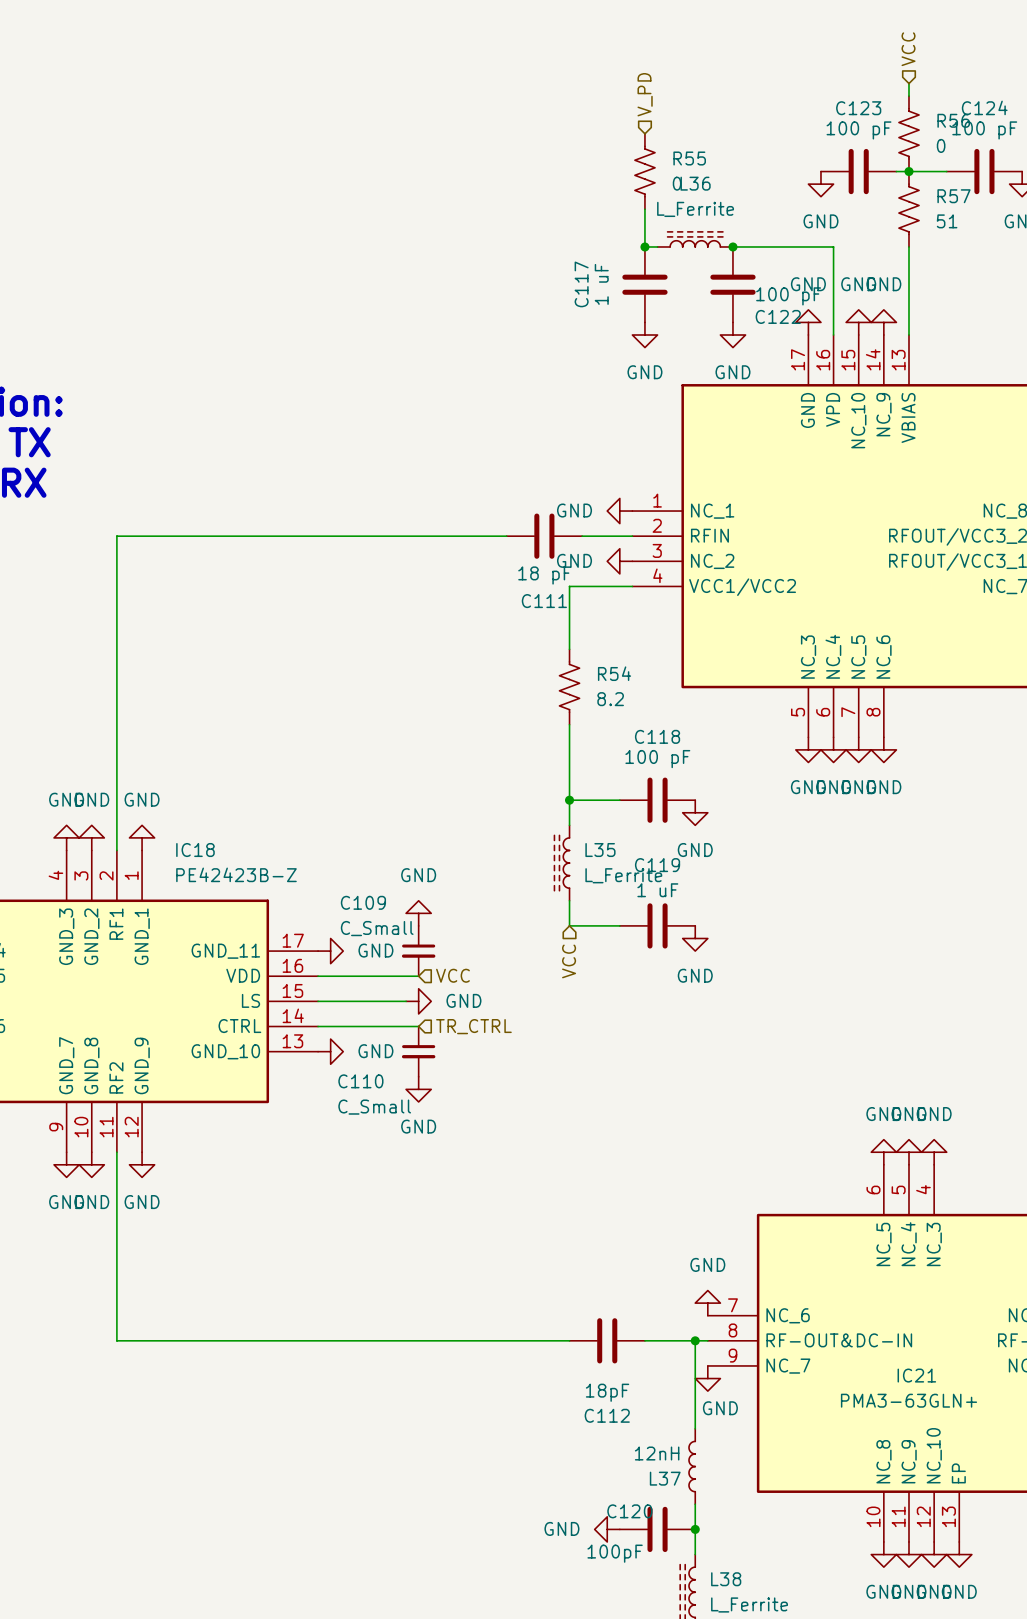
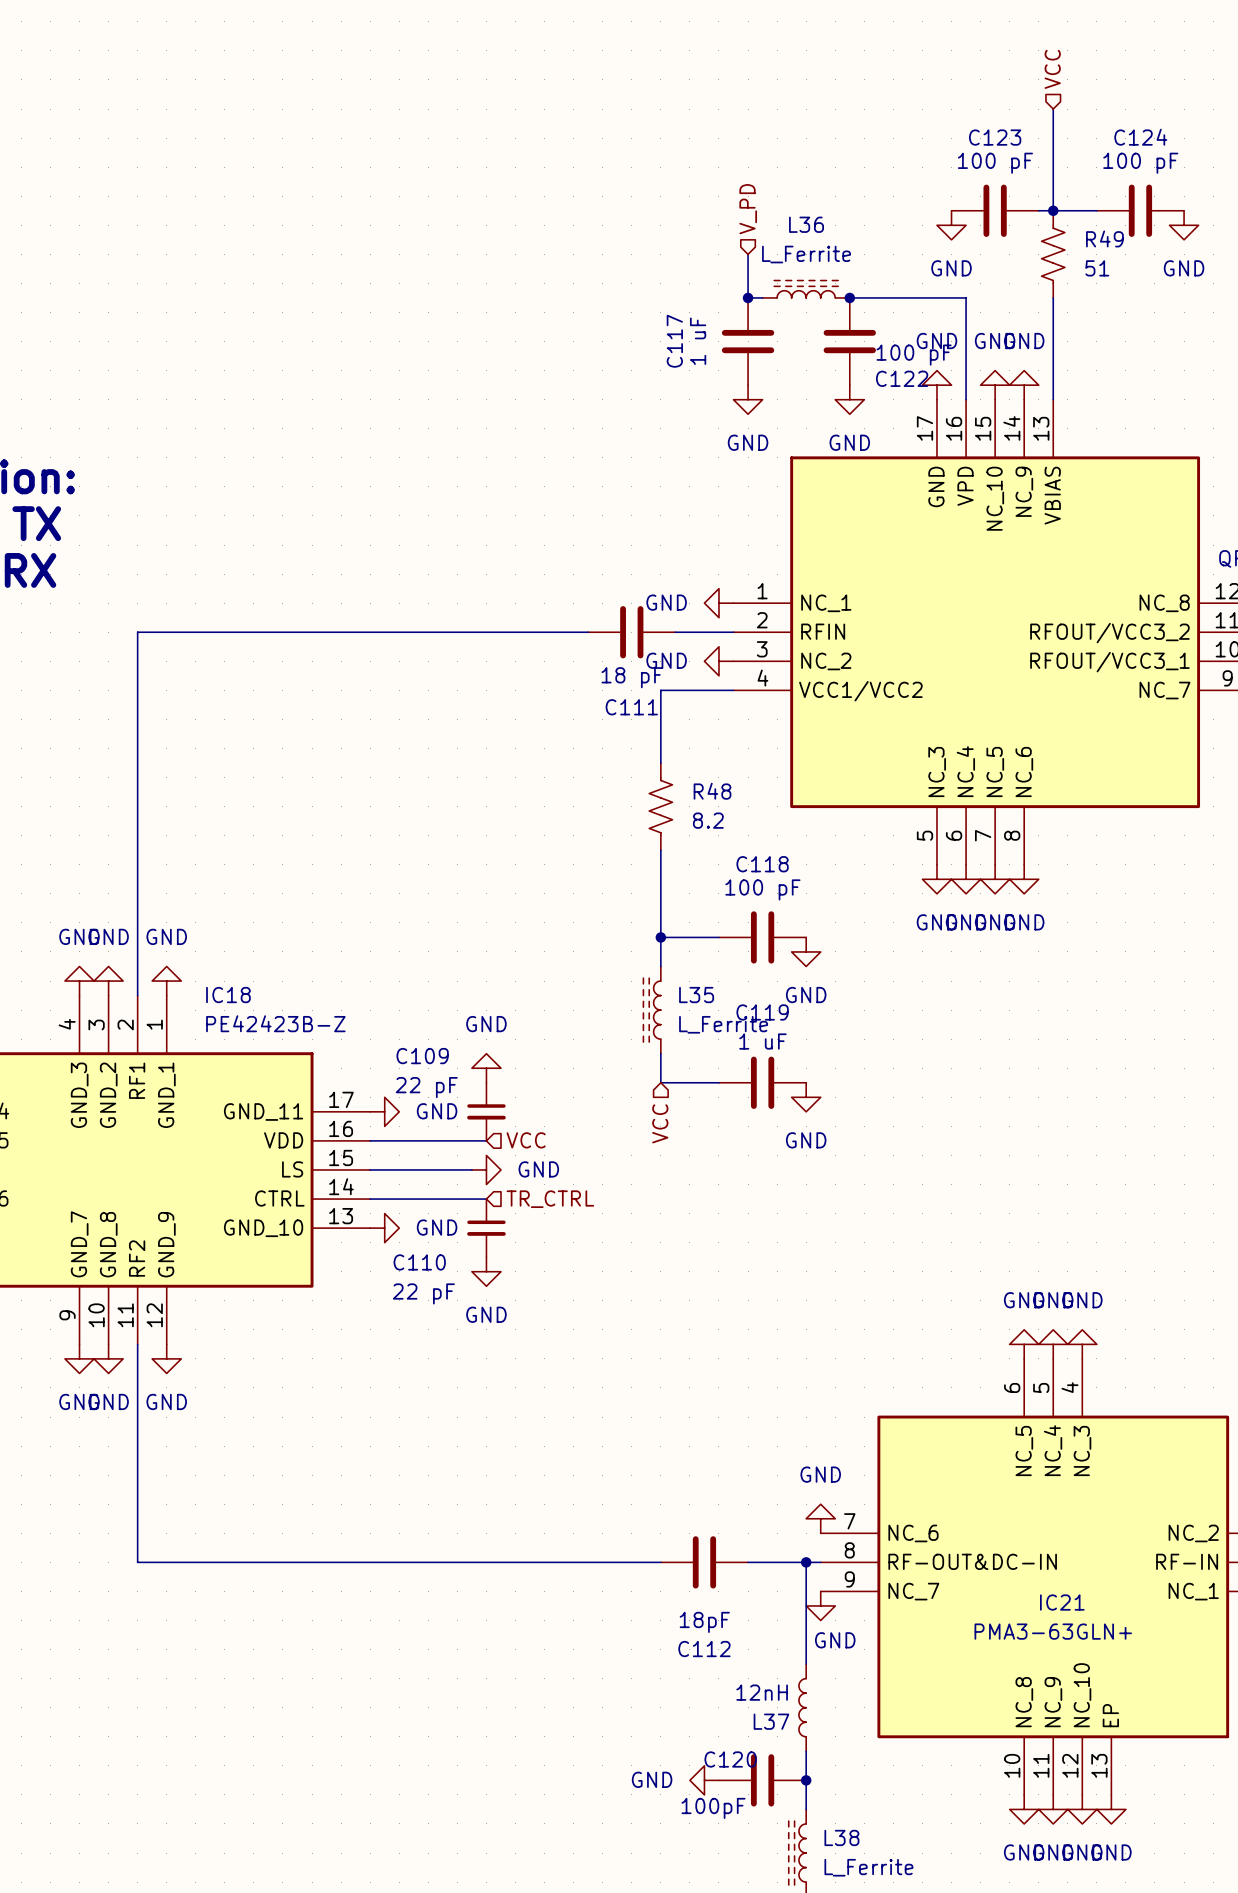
hierarchical label position: V_PD (645, 94) -> V_PD (748, 209)
R56: 0 (908, 133) -> none
R55: 0 (644, 171) -> none
R57 name: R57 (953, 196) -> R49 (1104, 238)
R54 name: R54 (614, 673) -> R48 (712, 791)
C109 value: C_Small (377, 928) -> 22 pF (426, 1087)
C110 value: C_Small (374, 1107) -> 22 pF (423, 1293)

